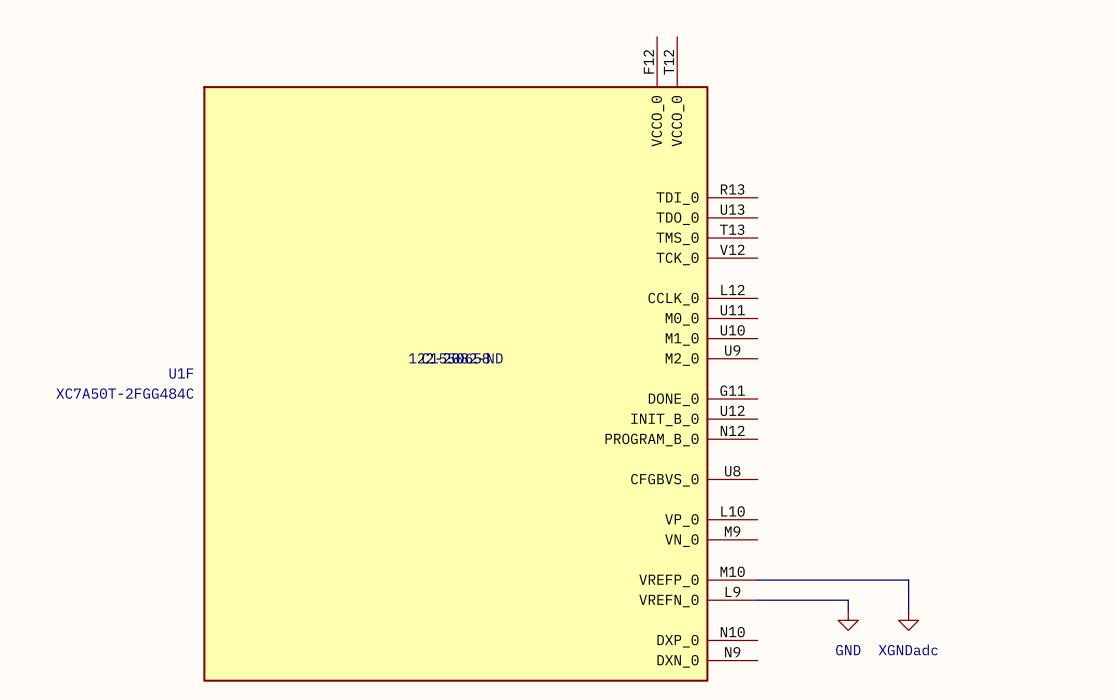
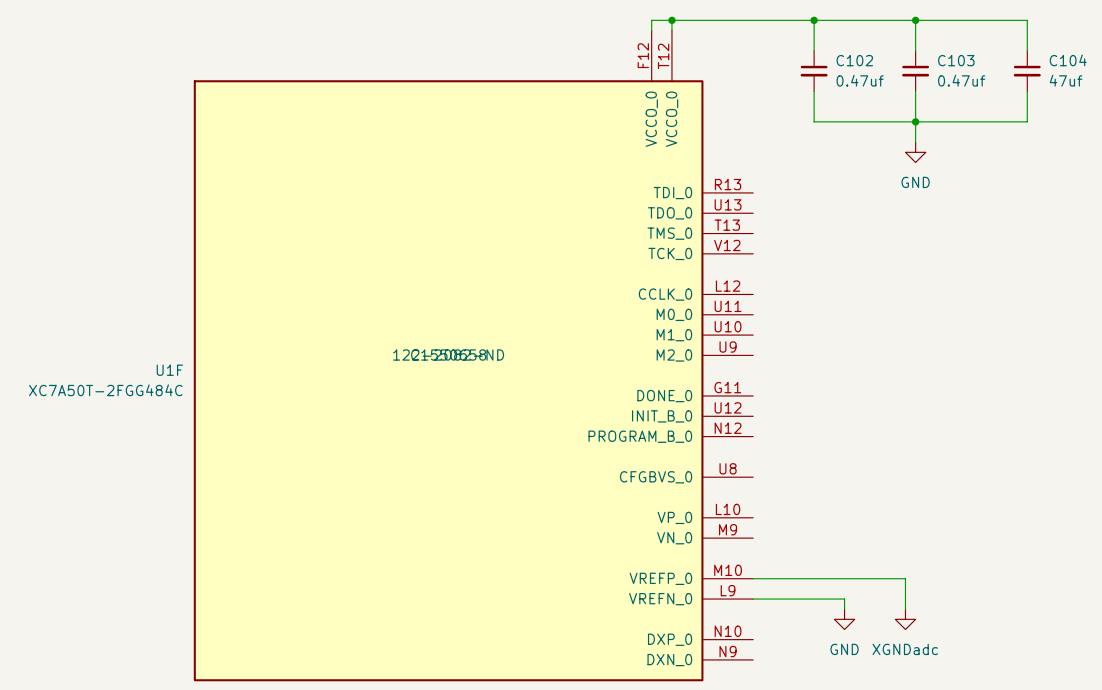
wire: none -> (671, 20) (671, 30)
junction: none -> (671, 20)
wire: none -> (814, 20) (814, 50)
junction: none -> (814, 20)
wire: none -> (915, 20) (915, 50)
junction: none -> (915, 20)
wire: none -> (651, 30) (651, 20) (1027, 20) (1027, 50)
C102: none -> 0.47uf (814, 71)
C103: none -> 0.47uf (915, 71)
C104: none -> 47uf (1027, 71)
wire: none -> (814, 91) (814, 121) (1027, 121) (1027, 91)
wire: none -> (915, 91) (915, 142)
junction: none -> (915, 121)
power symbol: none -> GND (915, 152)

